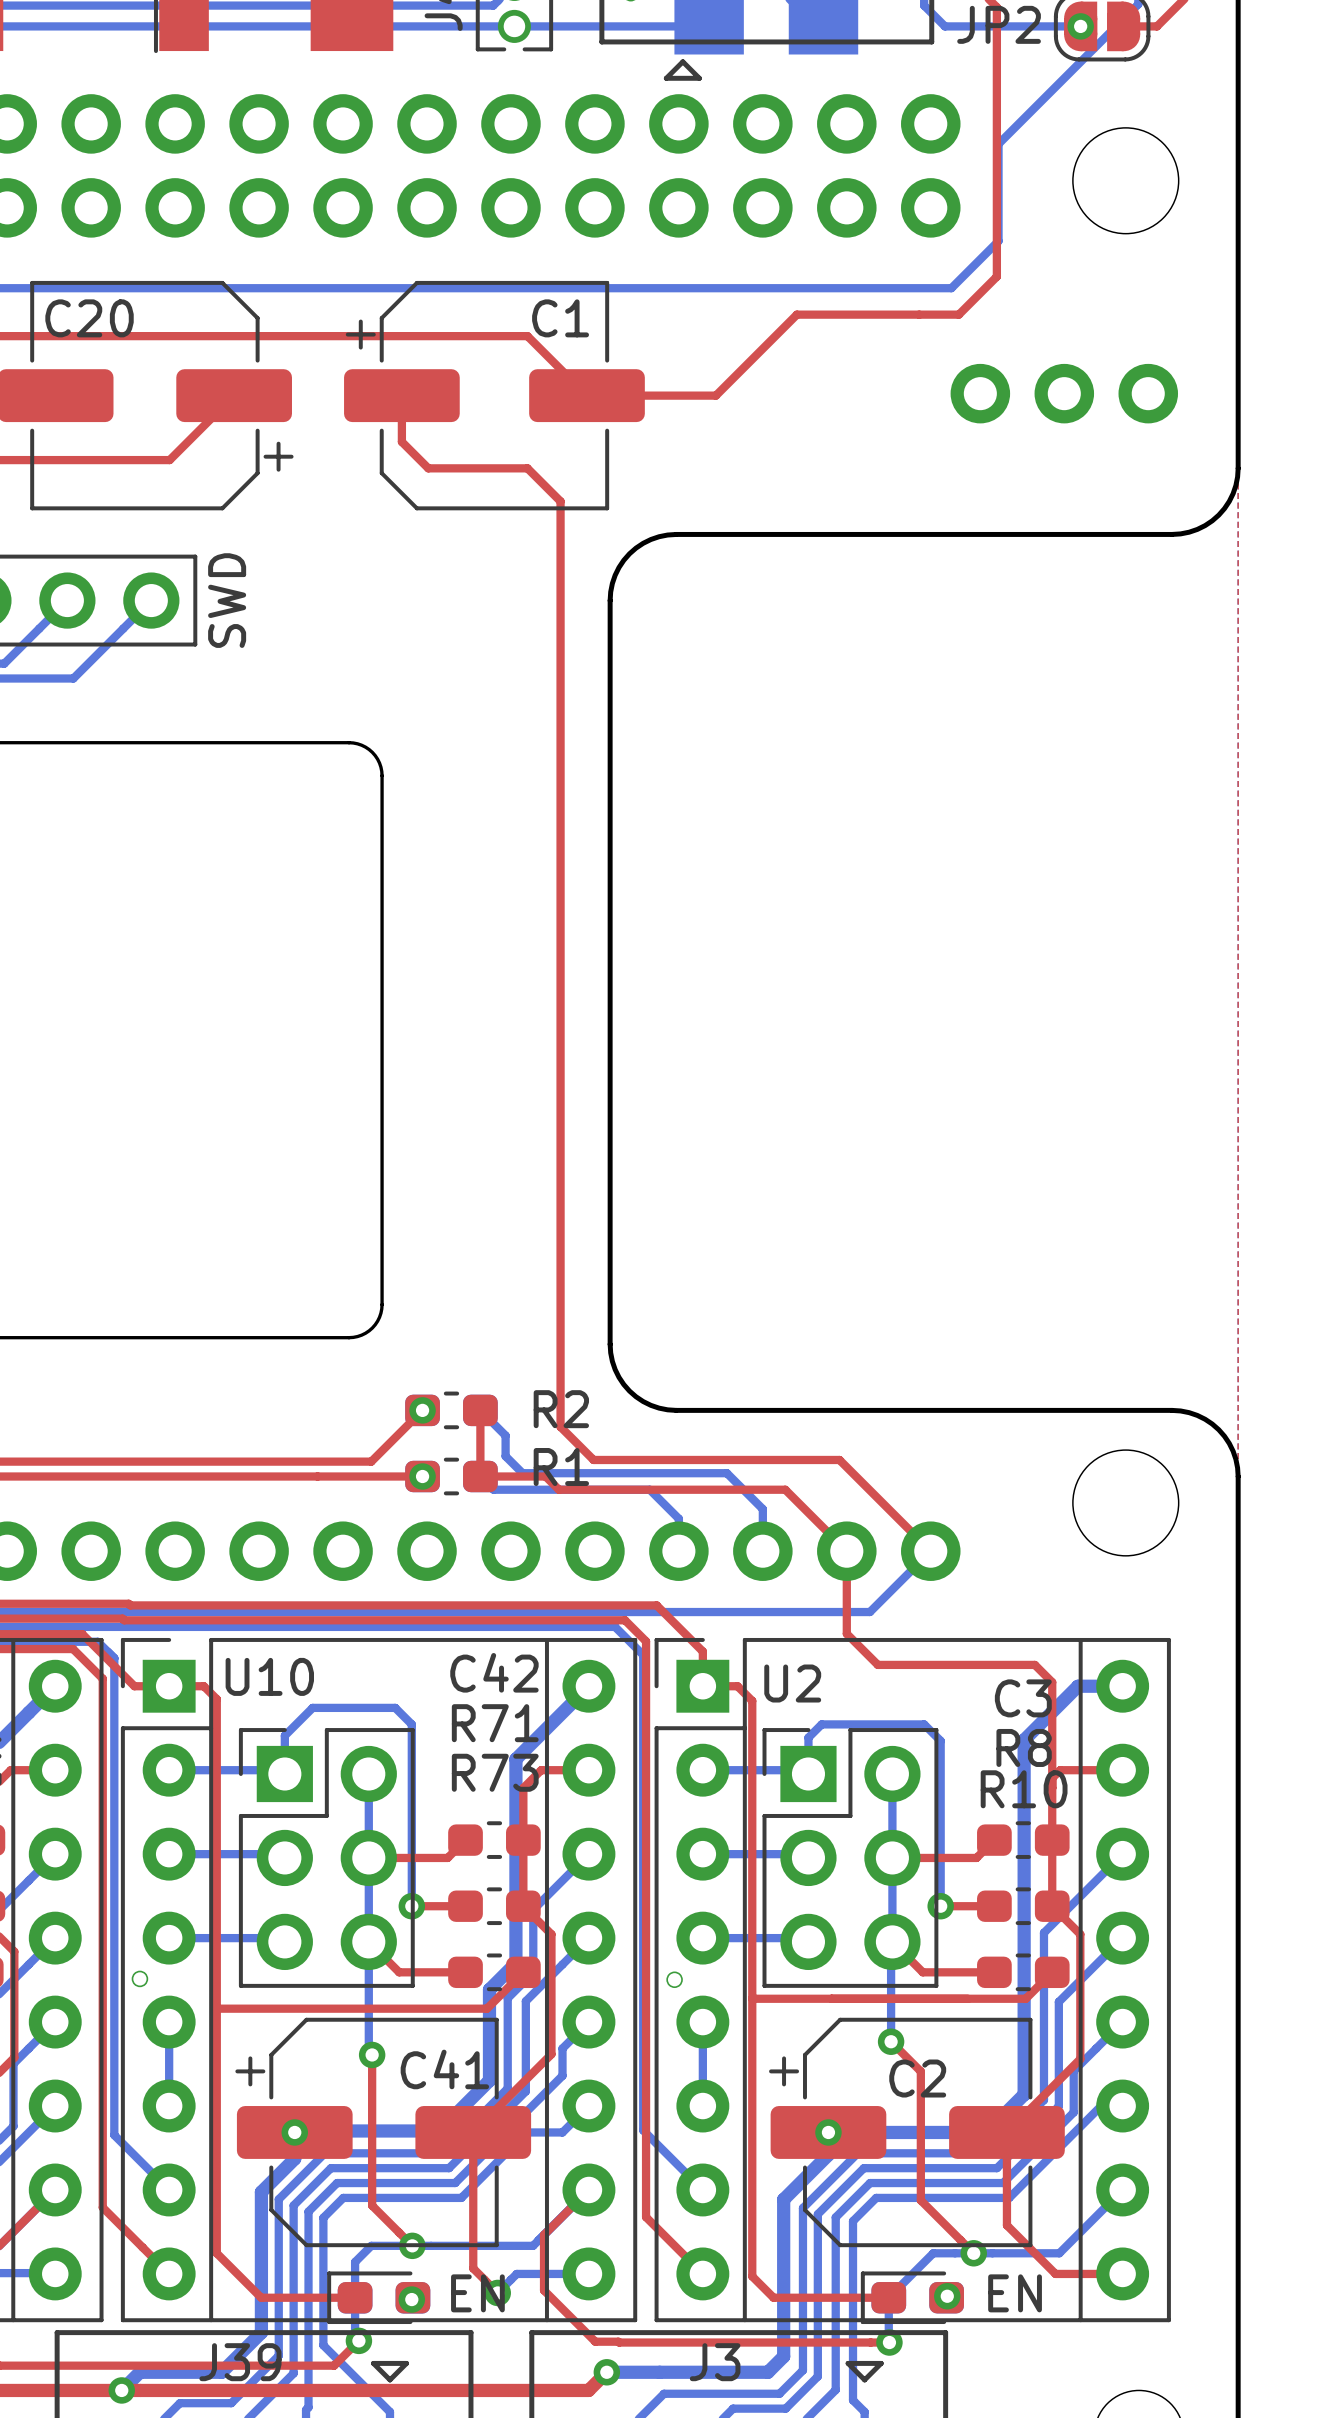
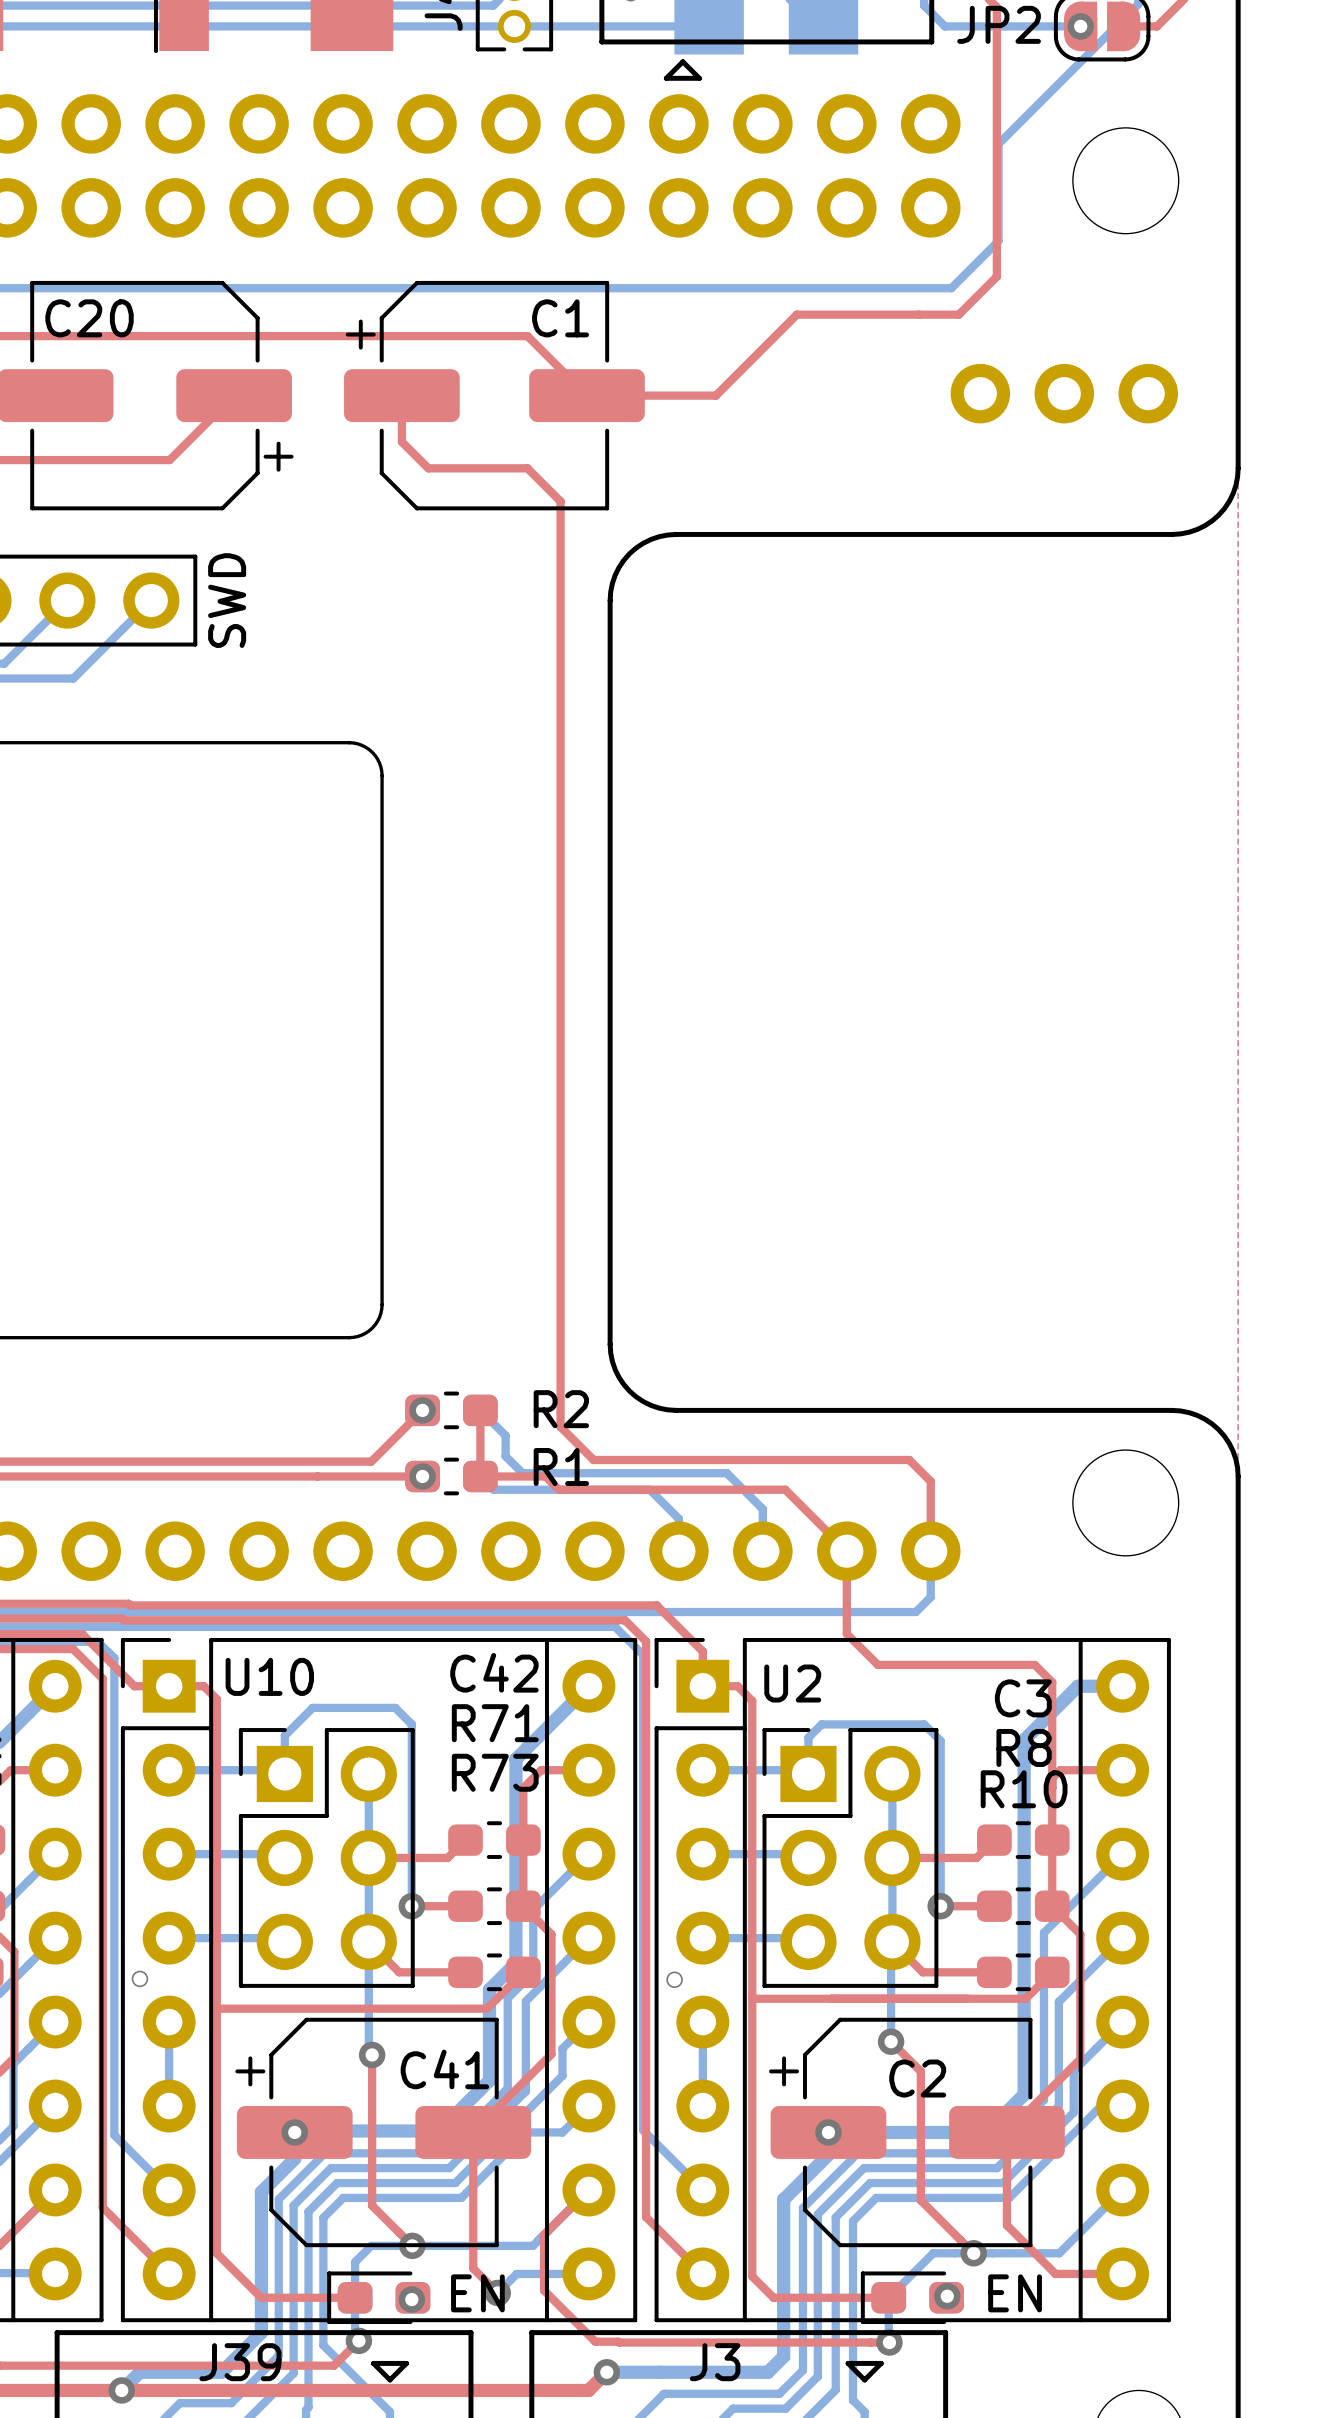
top track: (839, 1459) (930, 1551) -> (839, 1459) (909, 1459) (930, 1481) (930, 1551)
bottom track: (930, 1551) (869, 1612) -> (930, 1551) (930, 1597) (915, 1612) (869, 1612)

